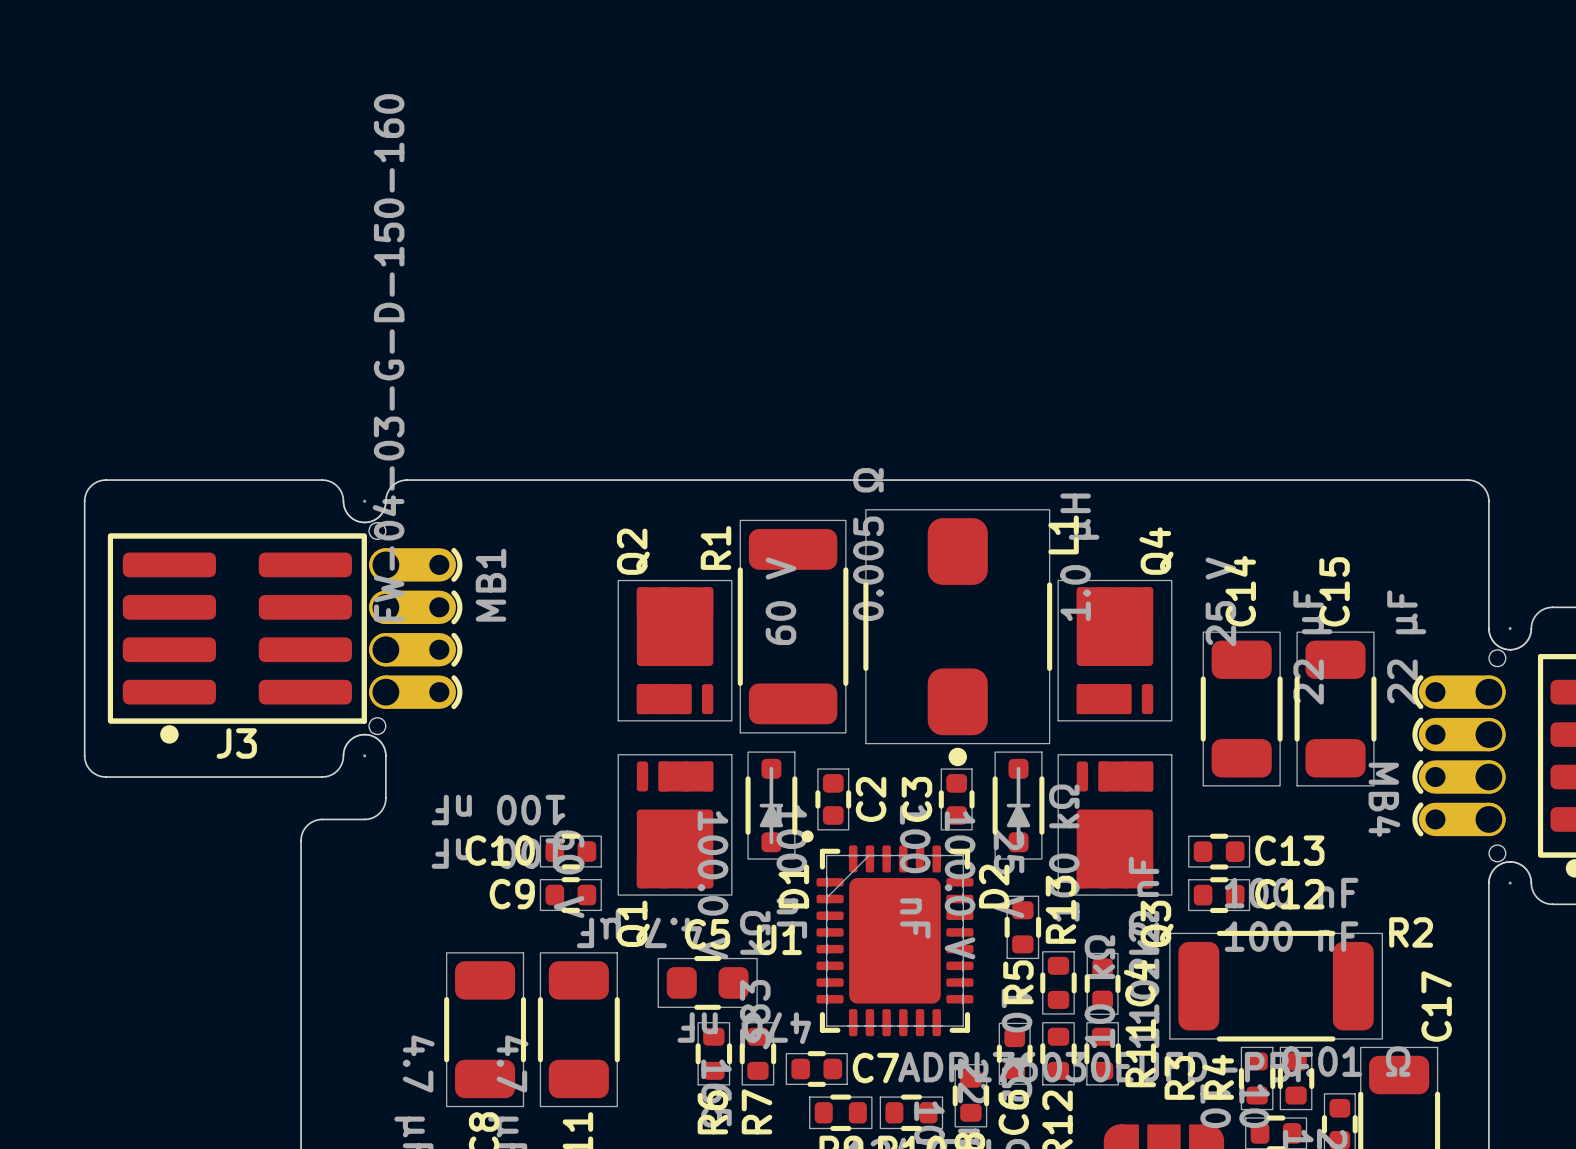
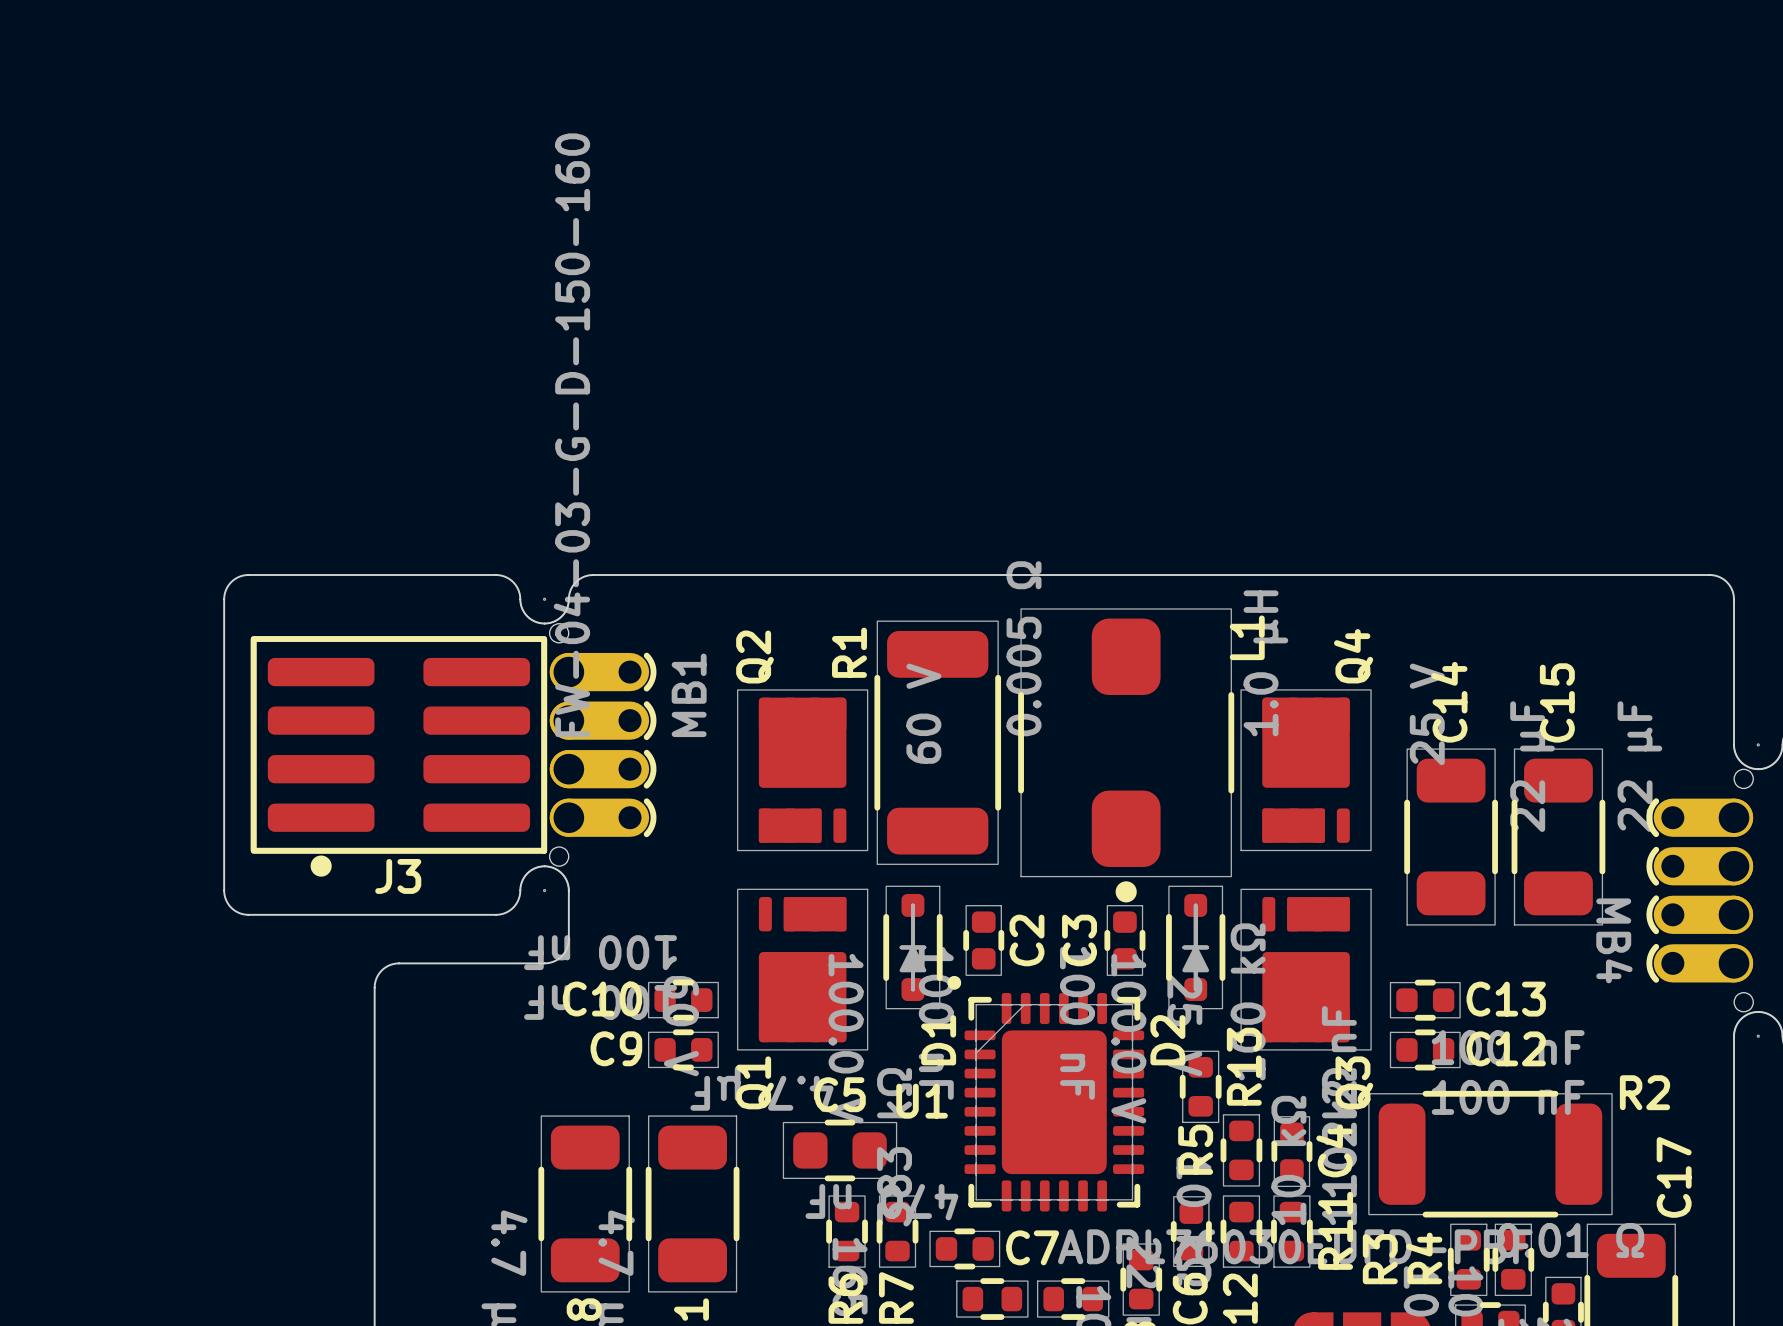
board edge: (190, 480) (101, 480) (89, 488) (84, 501) (85, 762) (92, 772) (103, 776) (190, 777) -> (248, 575) (240, 576) (231, 582) (225, 591) (224, 599) (224, 893) (227, 903) (233, 909) (248, 914)
board edge: (322, 480) (329, 481) (337, 486) (342, 494) (343, 505) (348, 514) (355, 520) (364, 522) (373, 520) (381, 514) (389, 489) (400, 481) (491, 480) -> (398, 575) (504, 576) (516, 586) (521, 607) (525, 614) (534, 621) (544, 623) (552, 622) (561, 616) (567, 607) (569, 593) (574, 584) (582, 577) (593, 575)
part: (415, 564) -> none
part: none -> (603, 672)
part: (415, 607) -> none
part: none -> (603, 720)
MB1 position: (364, 628) -> (544, 744)
J3 position: (237, 638) -> (398, 756)
part: (415, 649) -> none
part: none -> (603, 769)
part: (415, 692) -> none
part: none -> (603, 817)
board edge: (322, 777) (331, 774) (338, 769) (342, 762) (345, 746) (353, 737) (367, 734) (379, 740) (385, 753) (385, 802) (377, 814) (364, 819) -> (398, 914) (501, 914) (511, 909) (516, 903) (522, 880) (531, 870) (539, 866) (549, 866) (563, 875) (568, 887) (568, 939) (566, 949) (559, 958) (544, 963) (447, 963)

